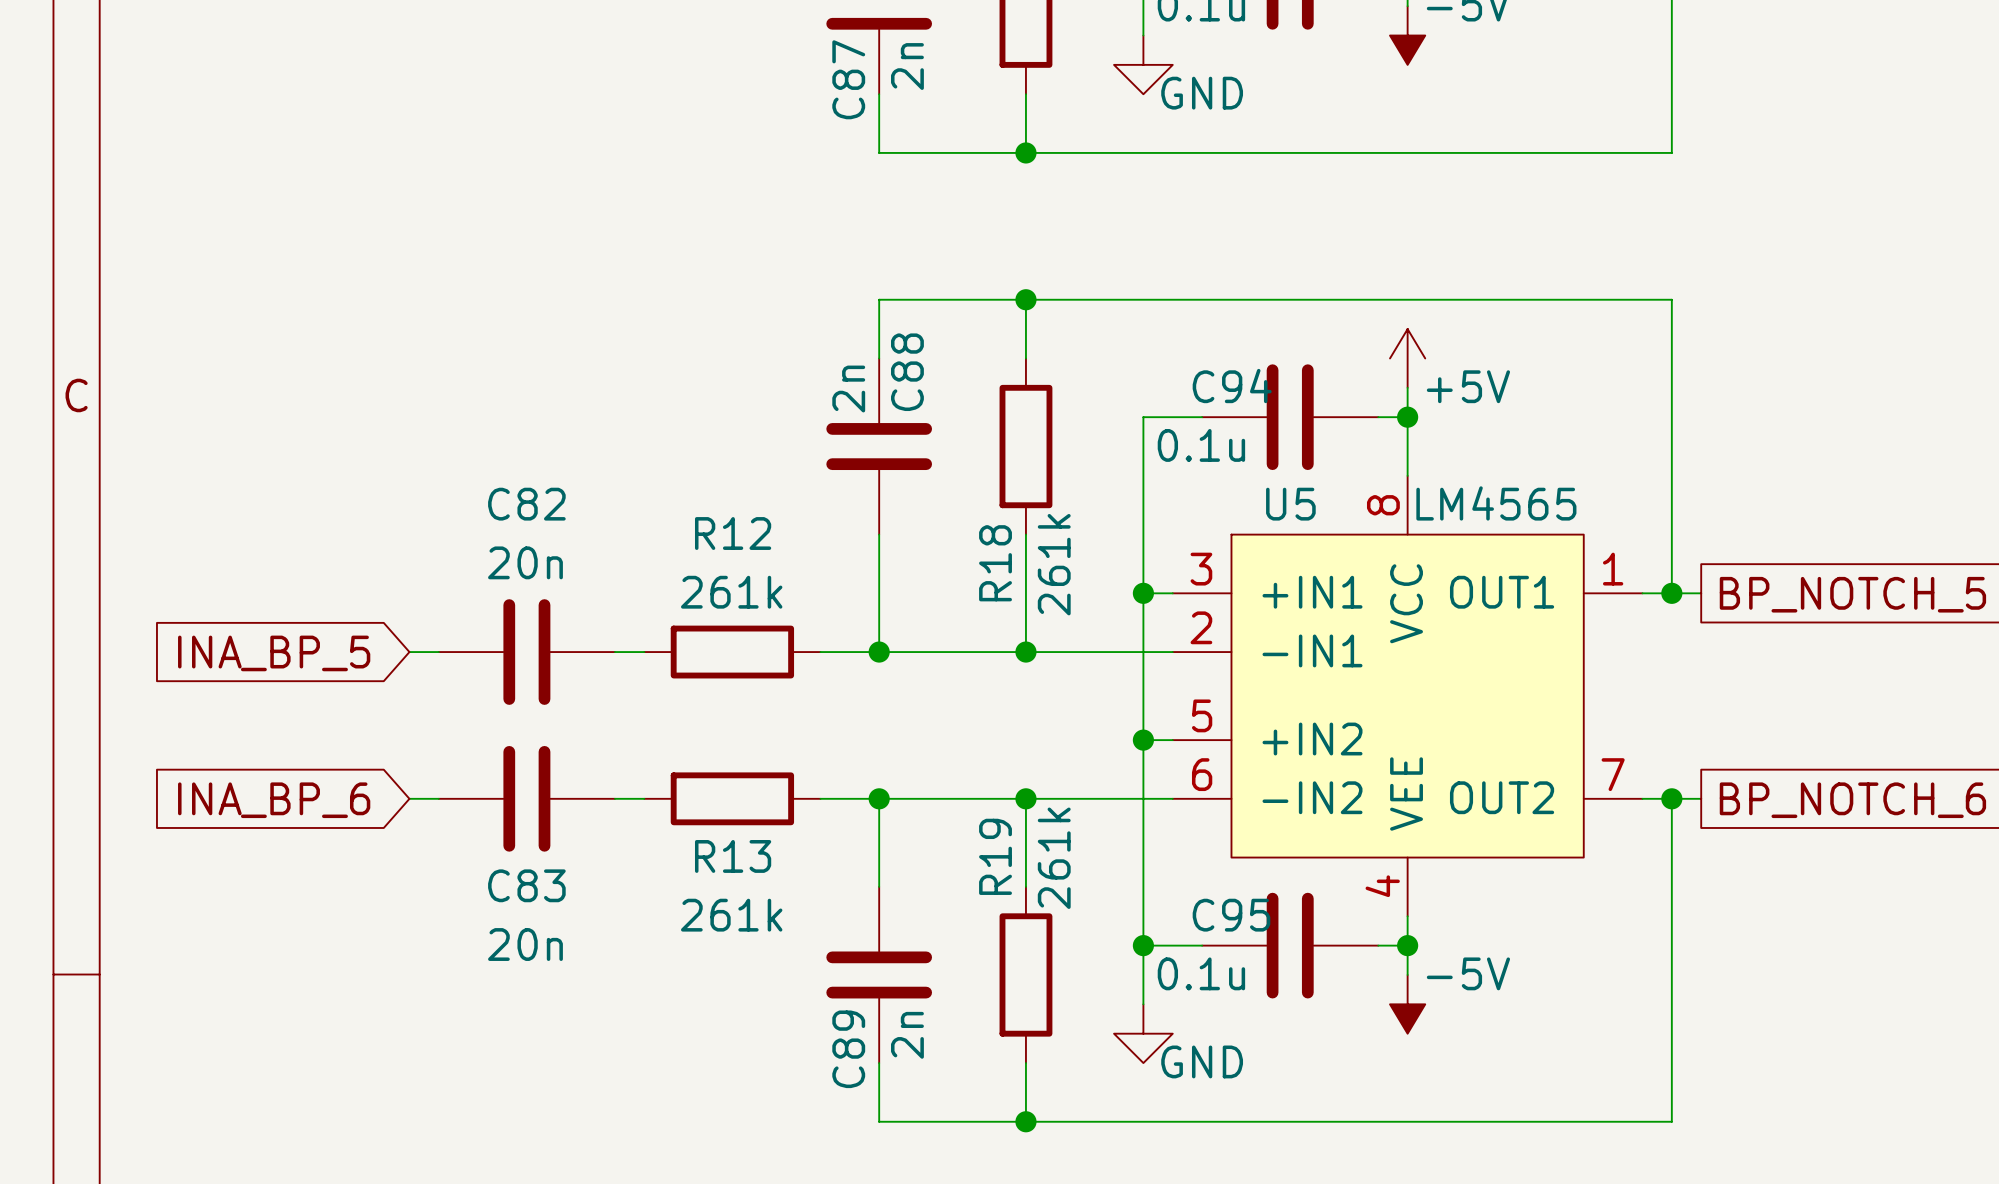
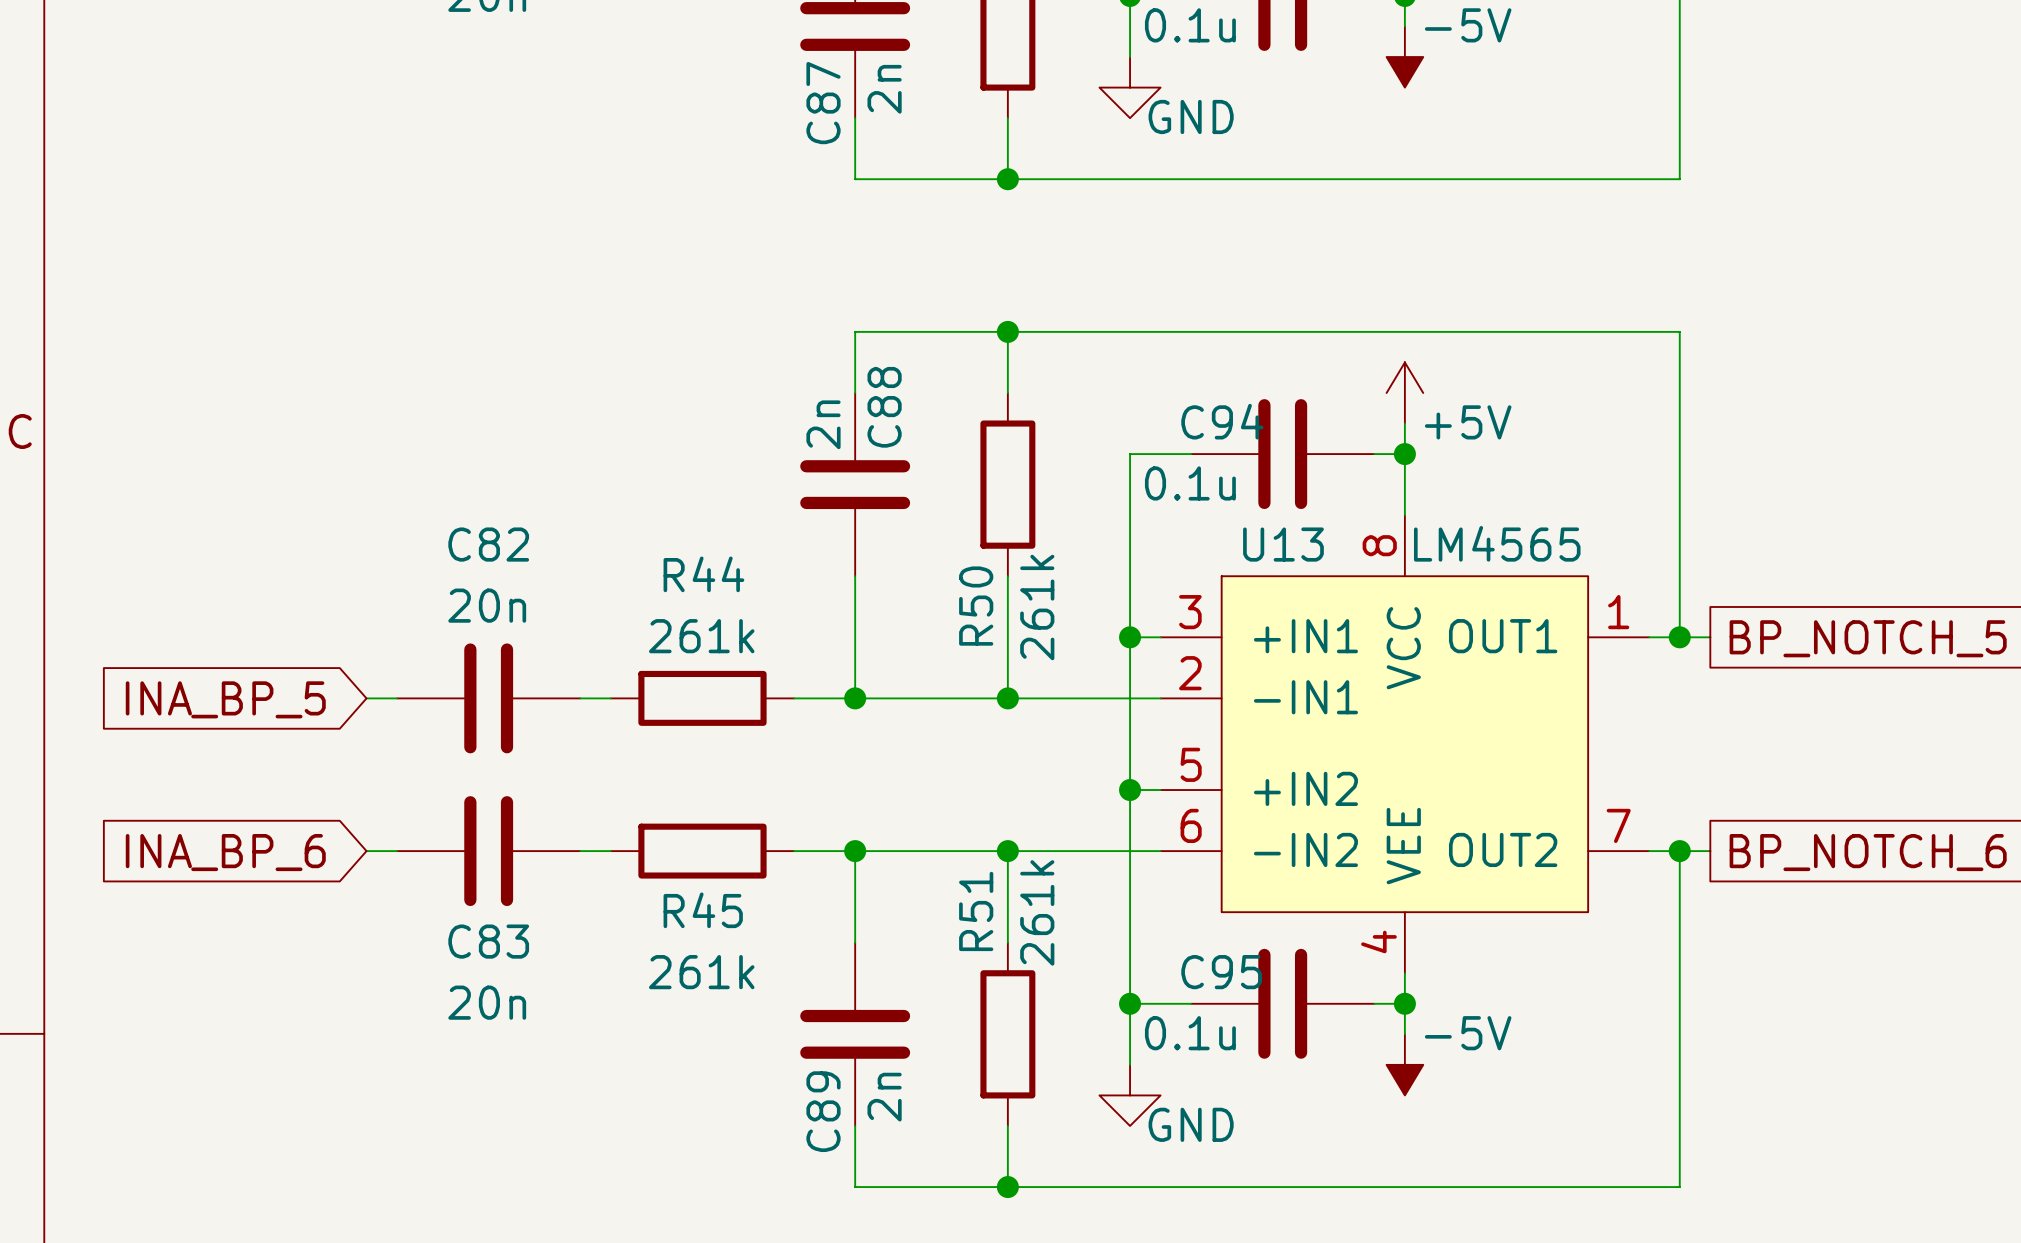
U5 name: U5 (1290, 504) -> U13 (1283, 544)
R12 name: R12 (733, 533) -> R44 (703, 574)
R18 name: R18 (995, 563) -> R50 (976, 606)
R13 name: R13 (733, 856) -> R45 (703, 910)
R19 name: R19 (995, 856) -> R51 (976, 911)

